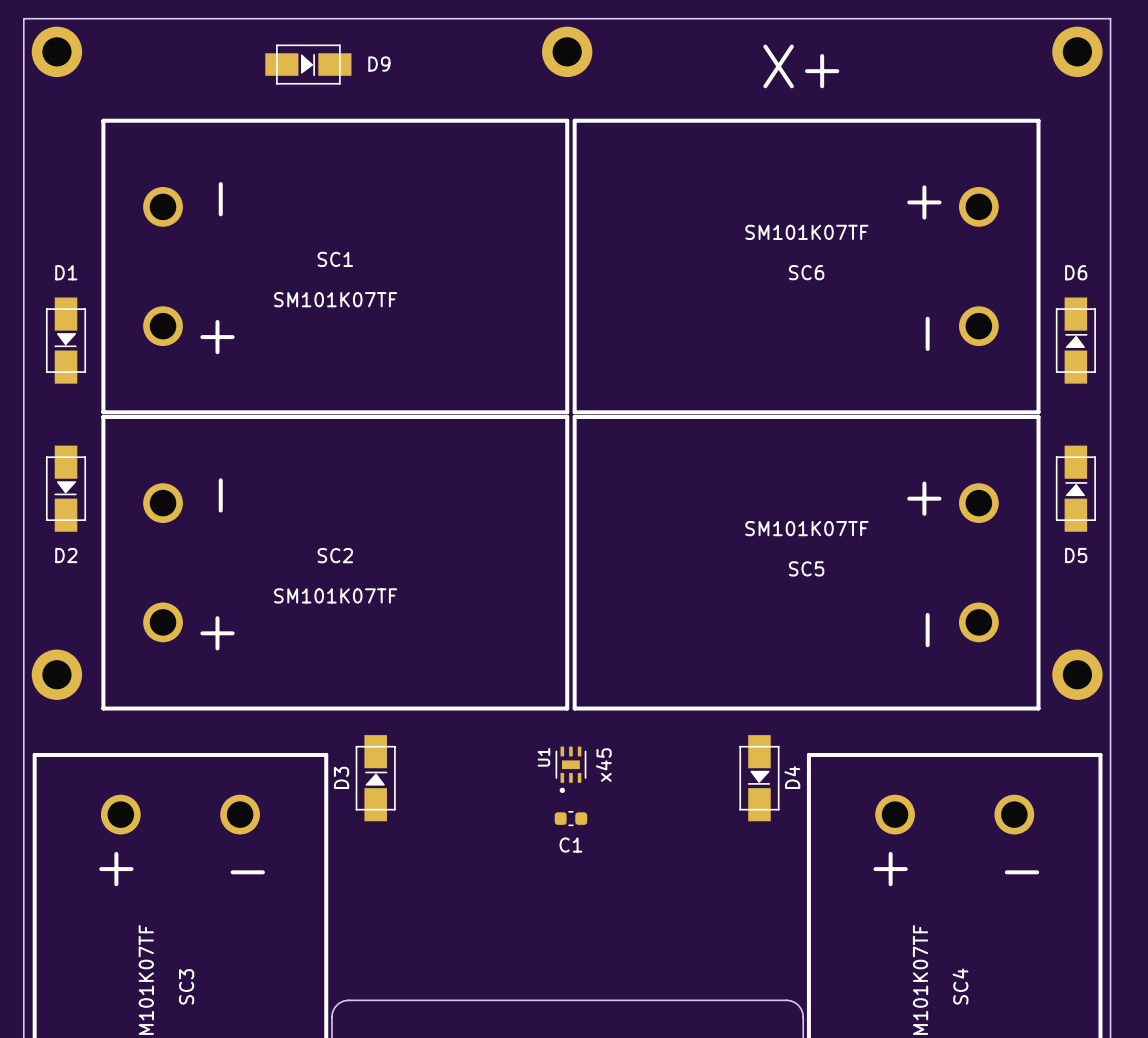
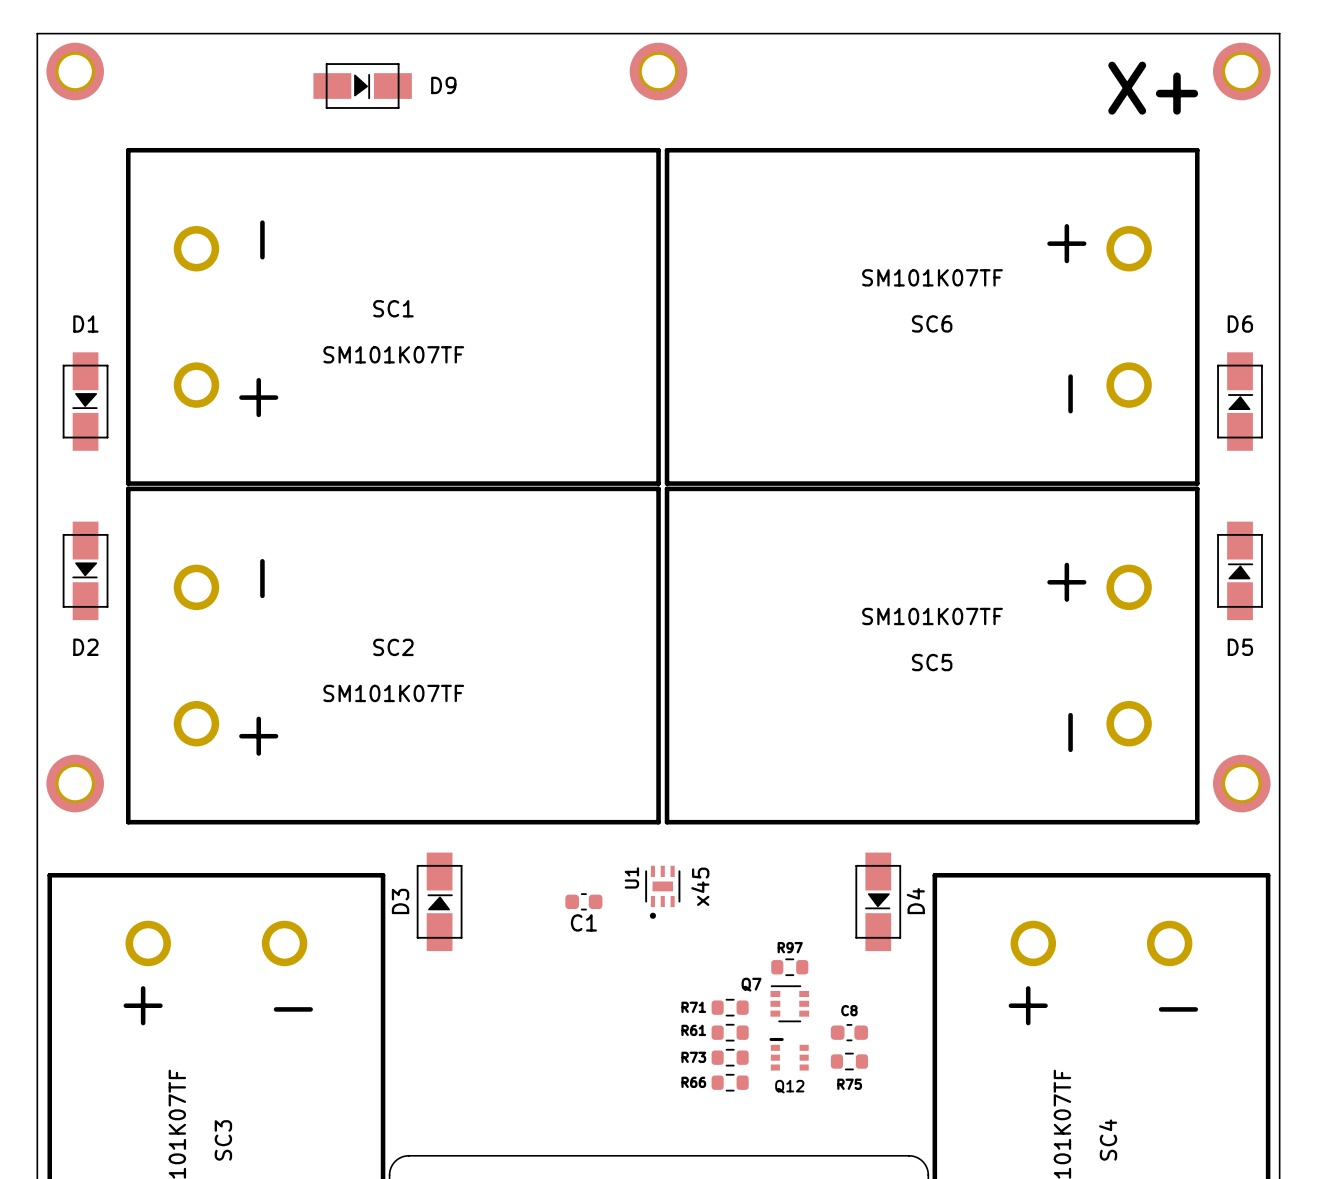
text position: X+ (801, 66) -> X+ (1153, 88)
C1 position: (570, 818) -> (583, 901)
R97: none -> (789, 967)
C1 name position: C1 (570, 845) -> C1 (583, 922)
Q7: none -> (789, 1003)
R71: none -> (730, 1007)
R61: none -> (730, 1032)
C8: none -> (849, 1032)
Q12: none -> (789, 1054)
R73: none -> (730, 1057)
R75: none -> (849, 1061)
R66: none -> (730, 1082)

